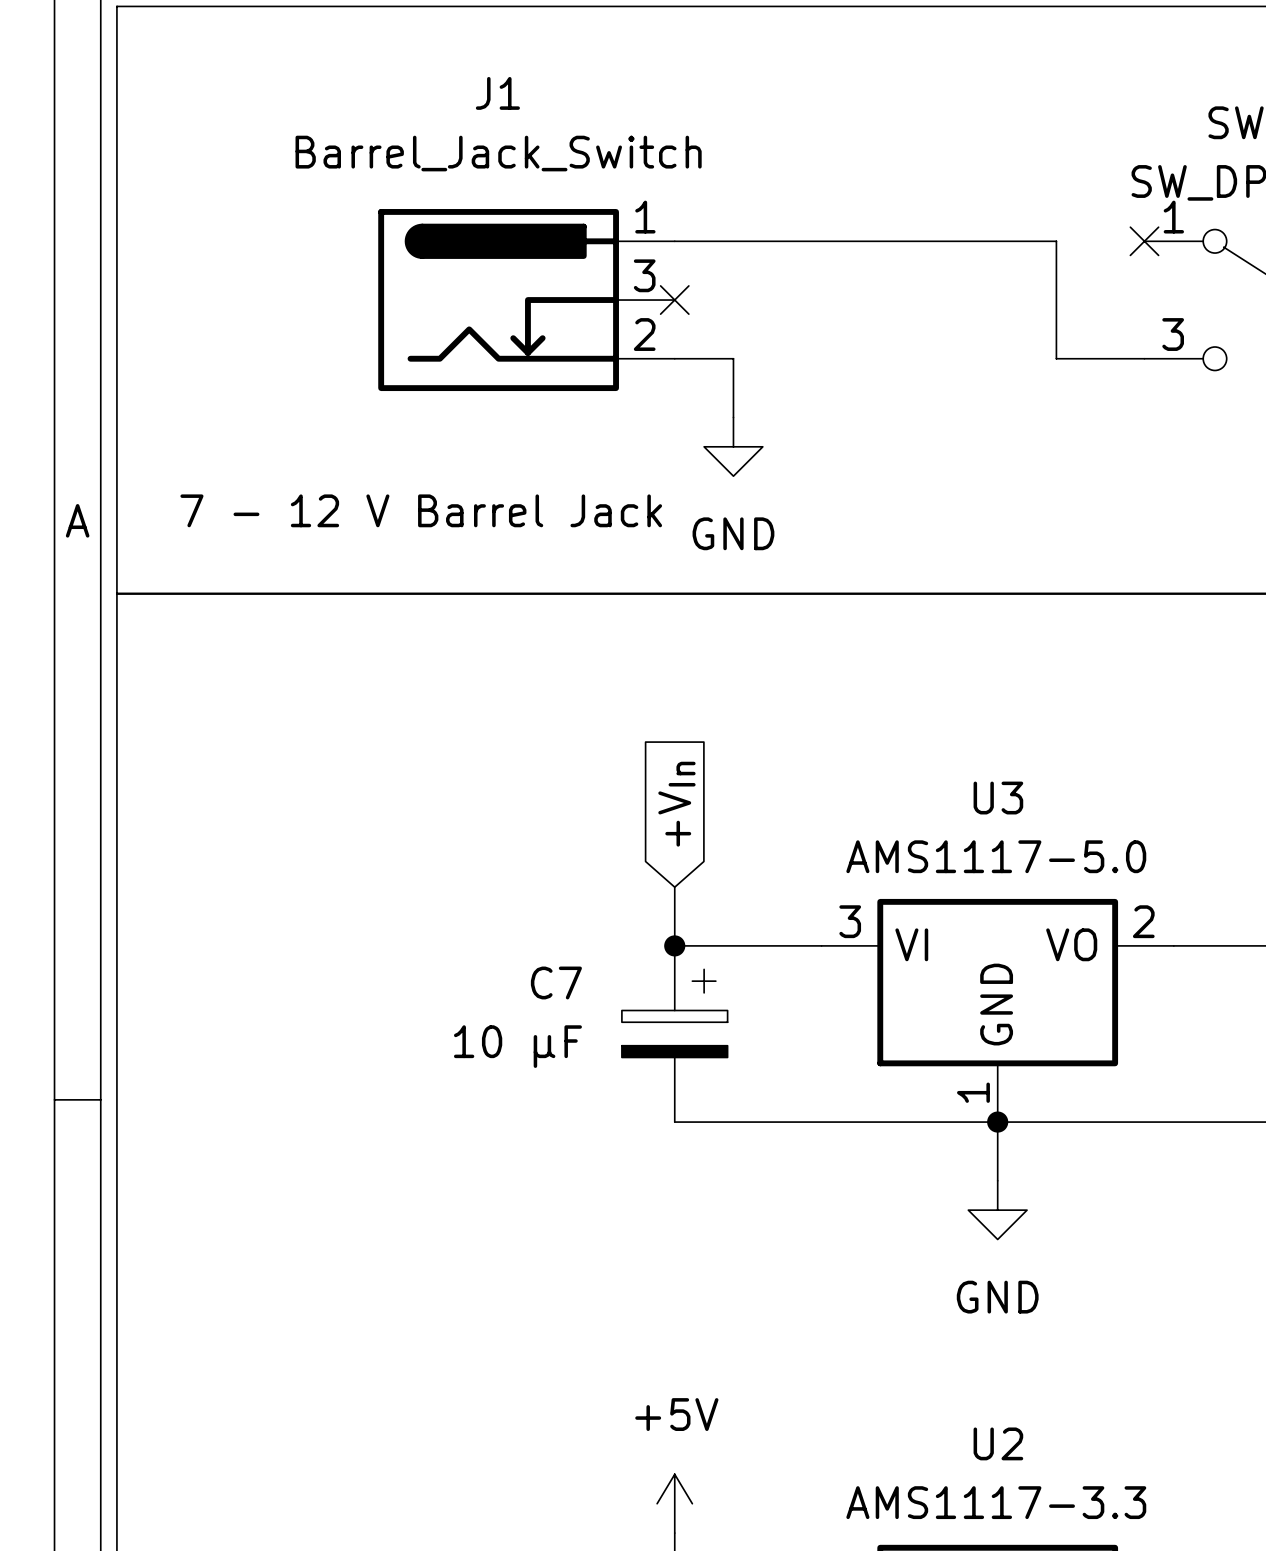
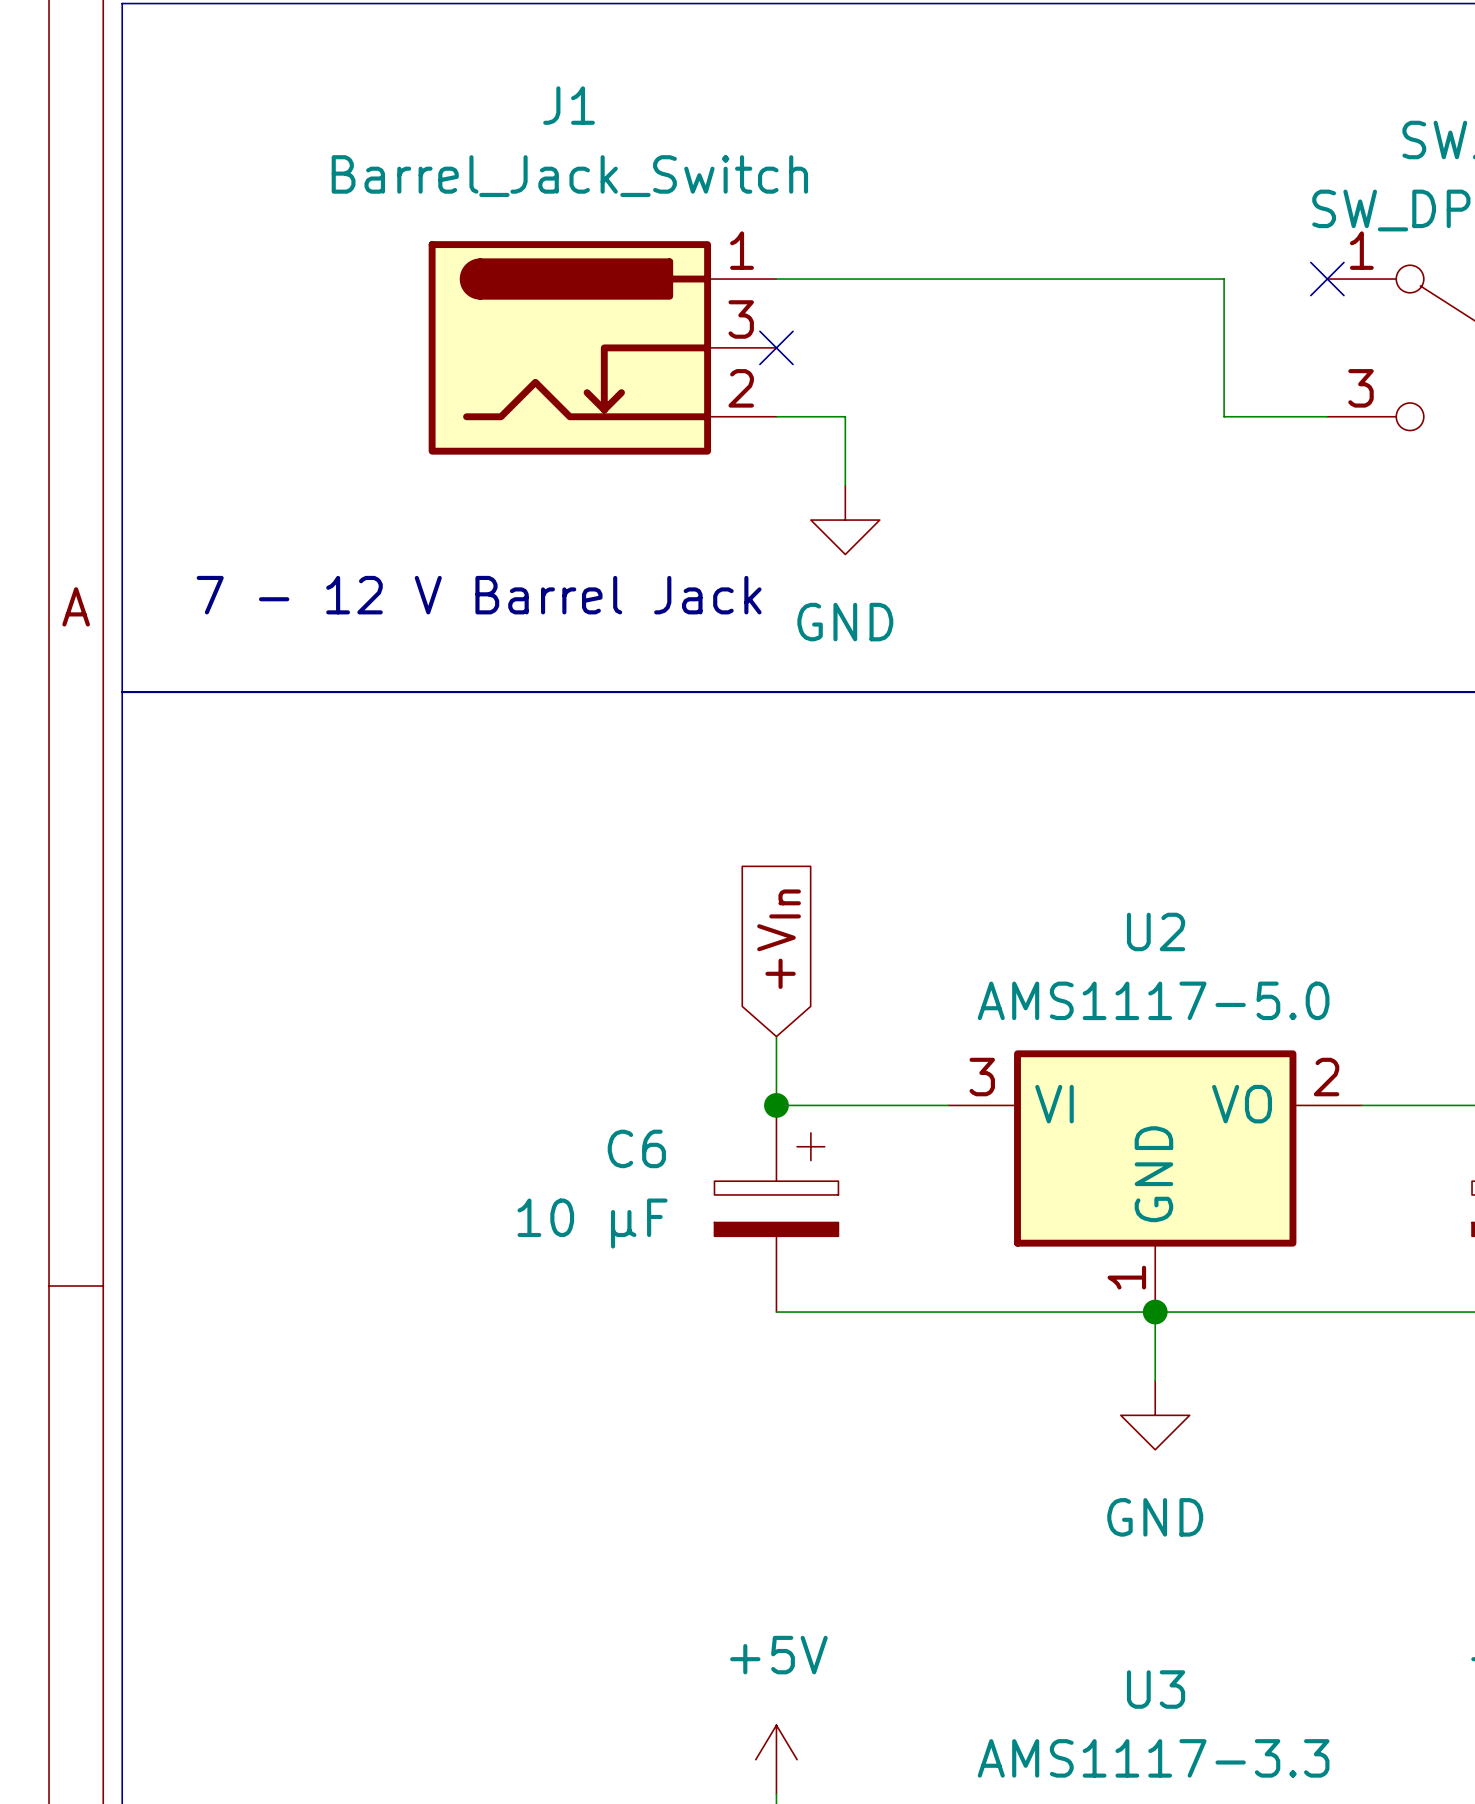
U3 name: U3 (998, 798) -> U2 (1156, 931)
C7 name: C7 (556, 982) -> C6 (636, 1148)
U2 name: U2 (998, 1443) -> U3 (1156, 1689)

